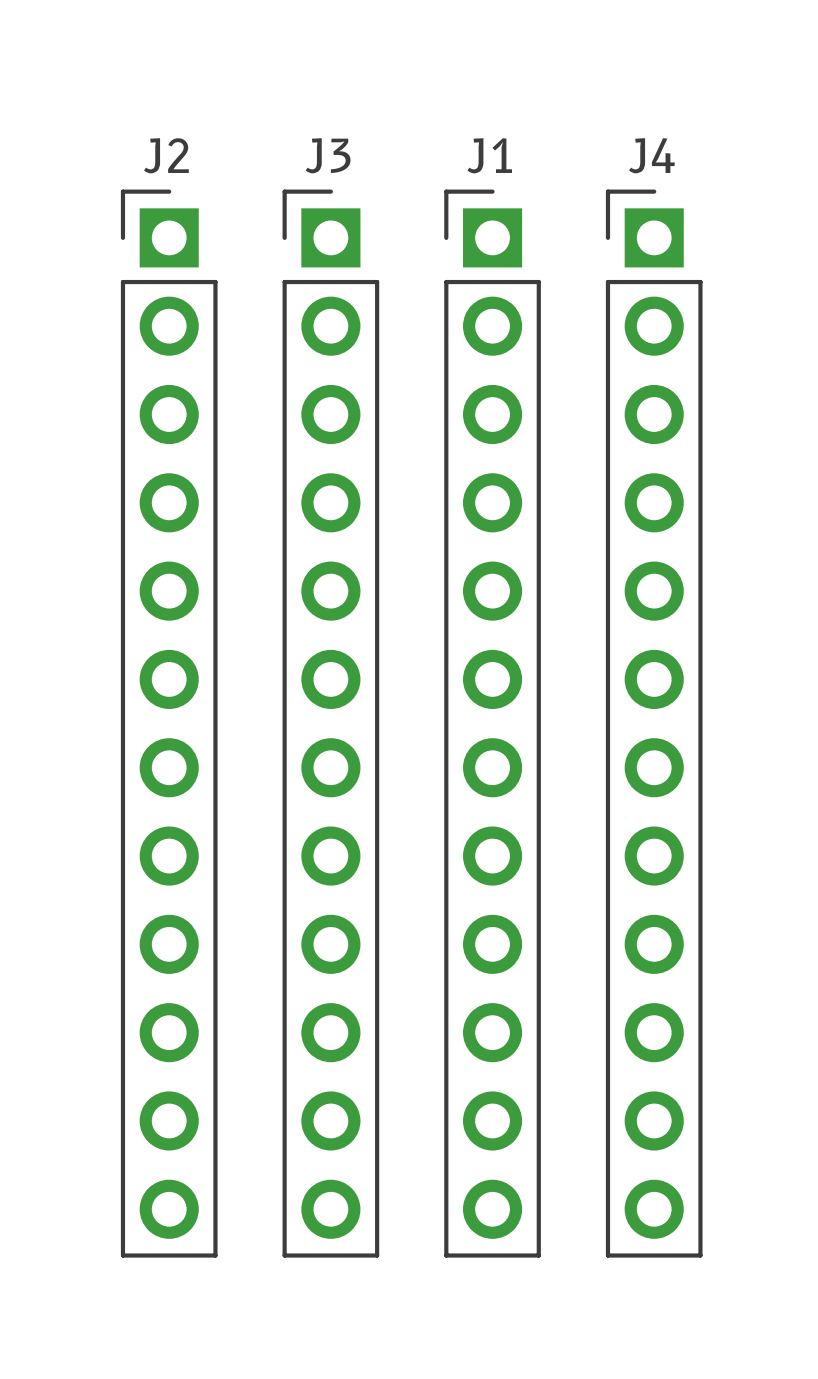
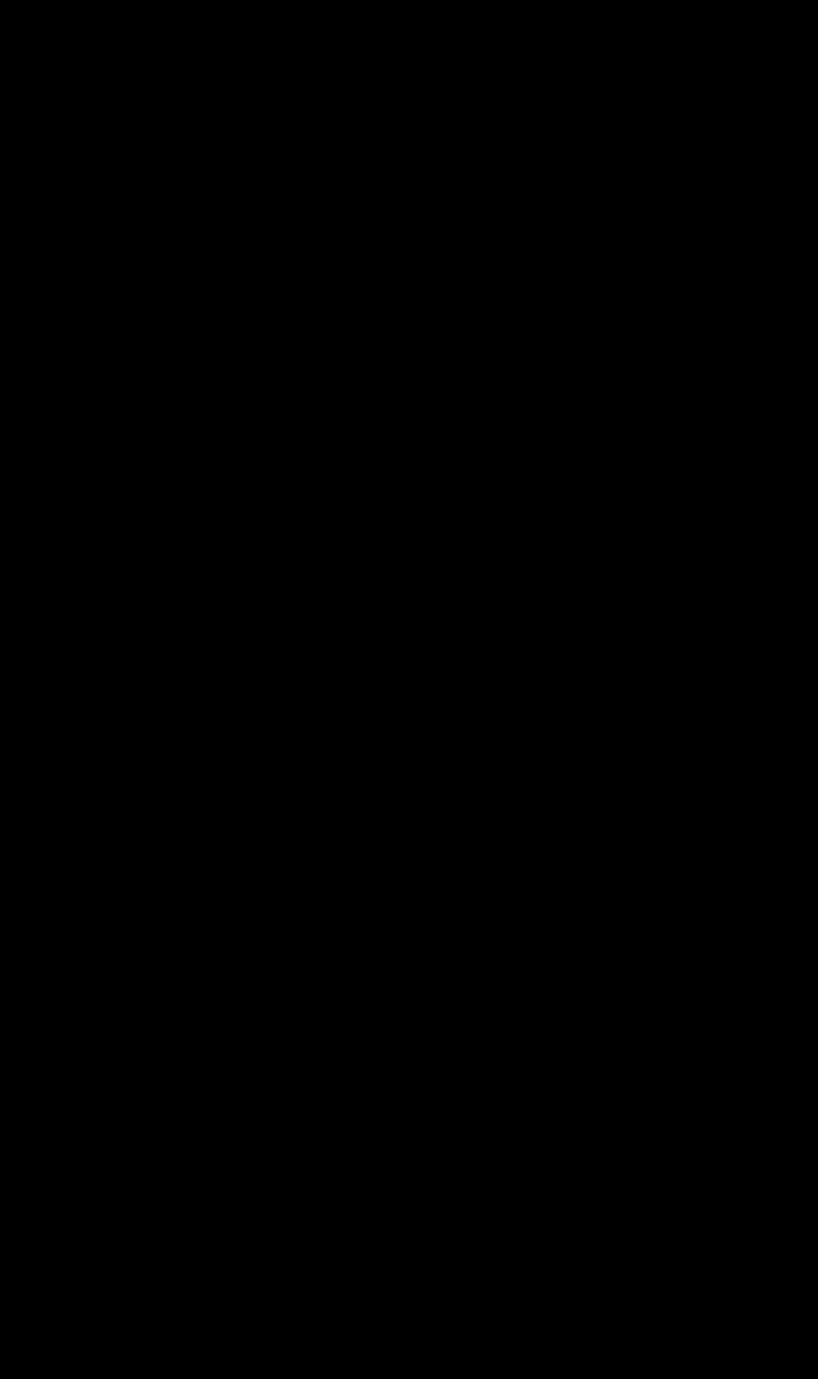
J2: (169, 723) -> none
J3: (330, 723) -> none
J1: (492, 723) -> none
J4: (654, 723) -> none

